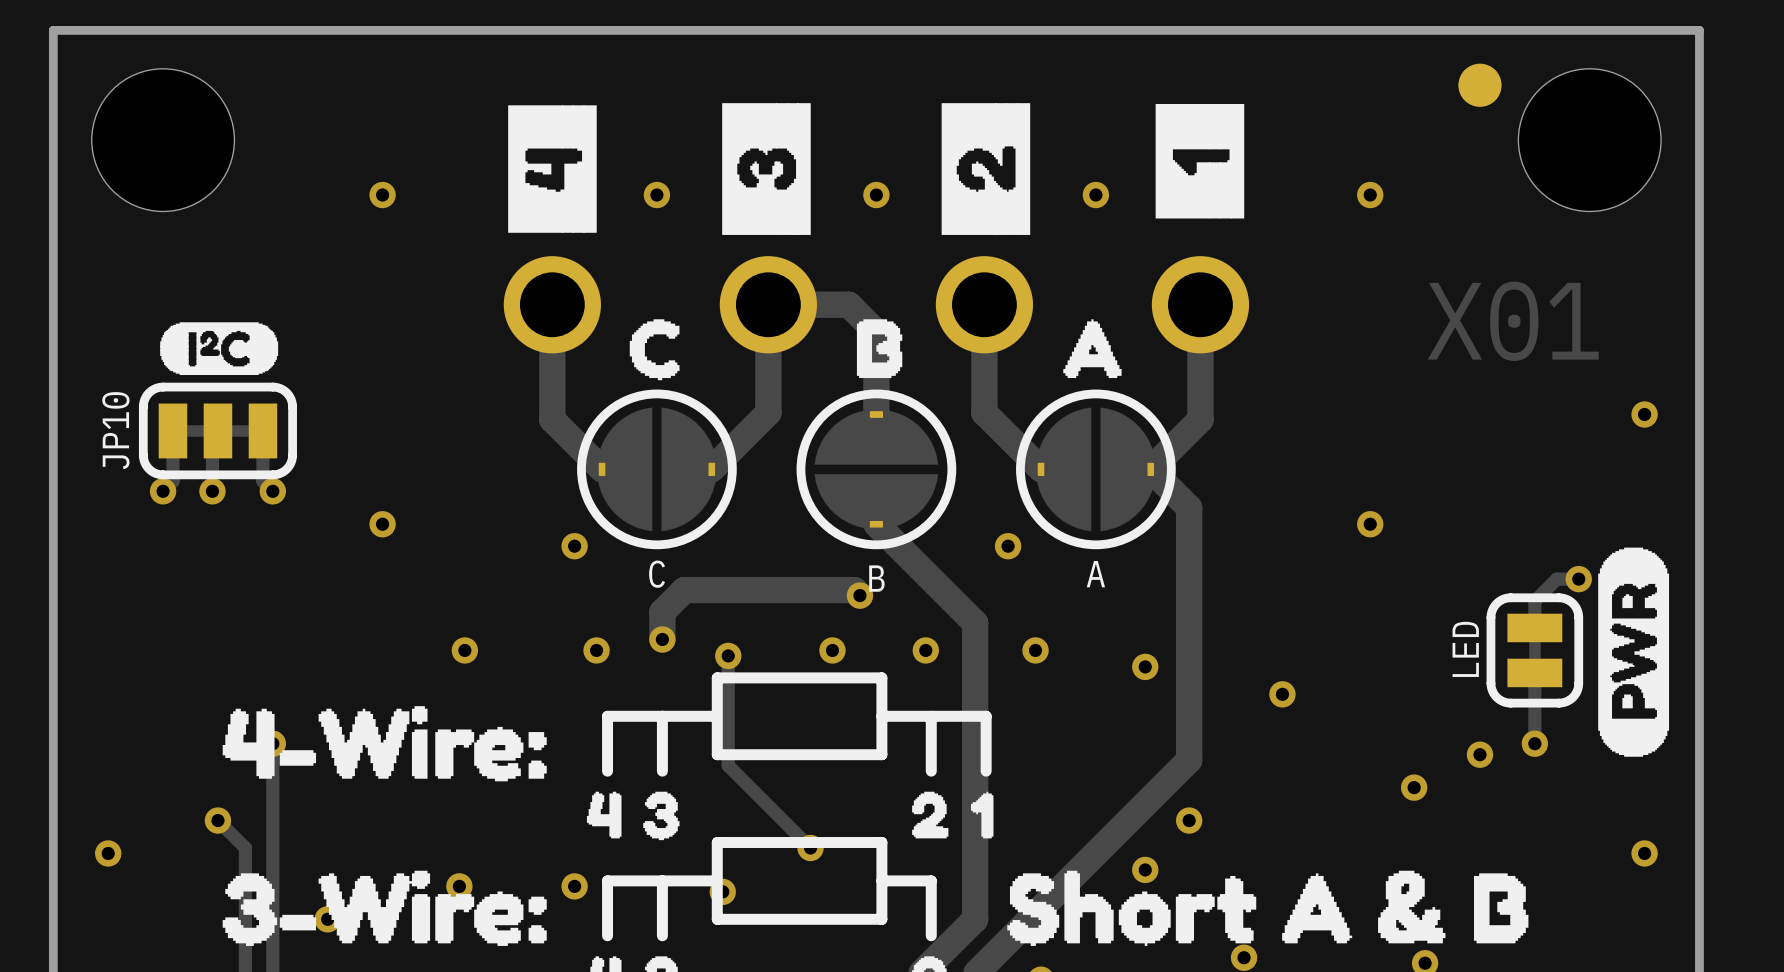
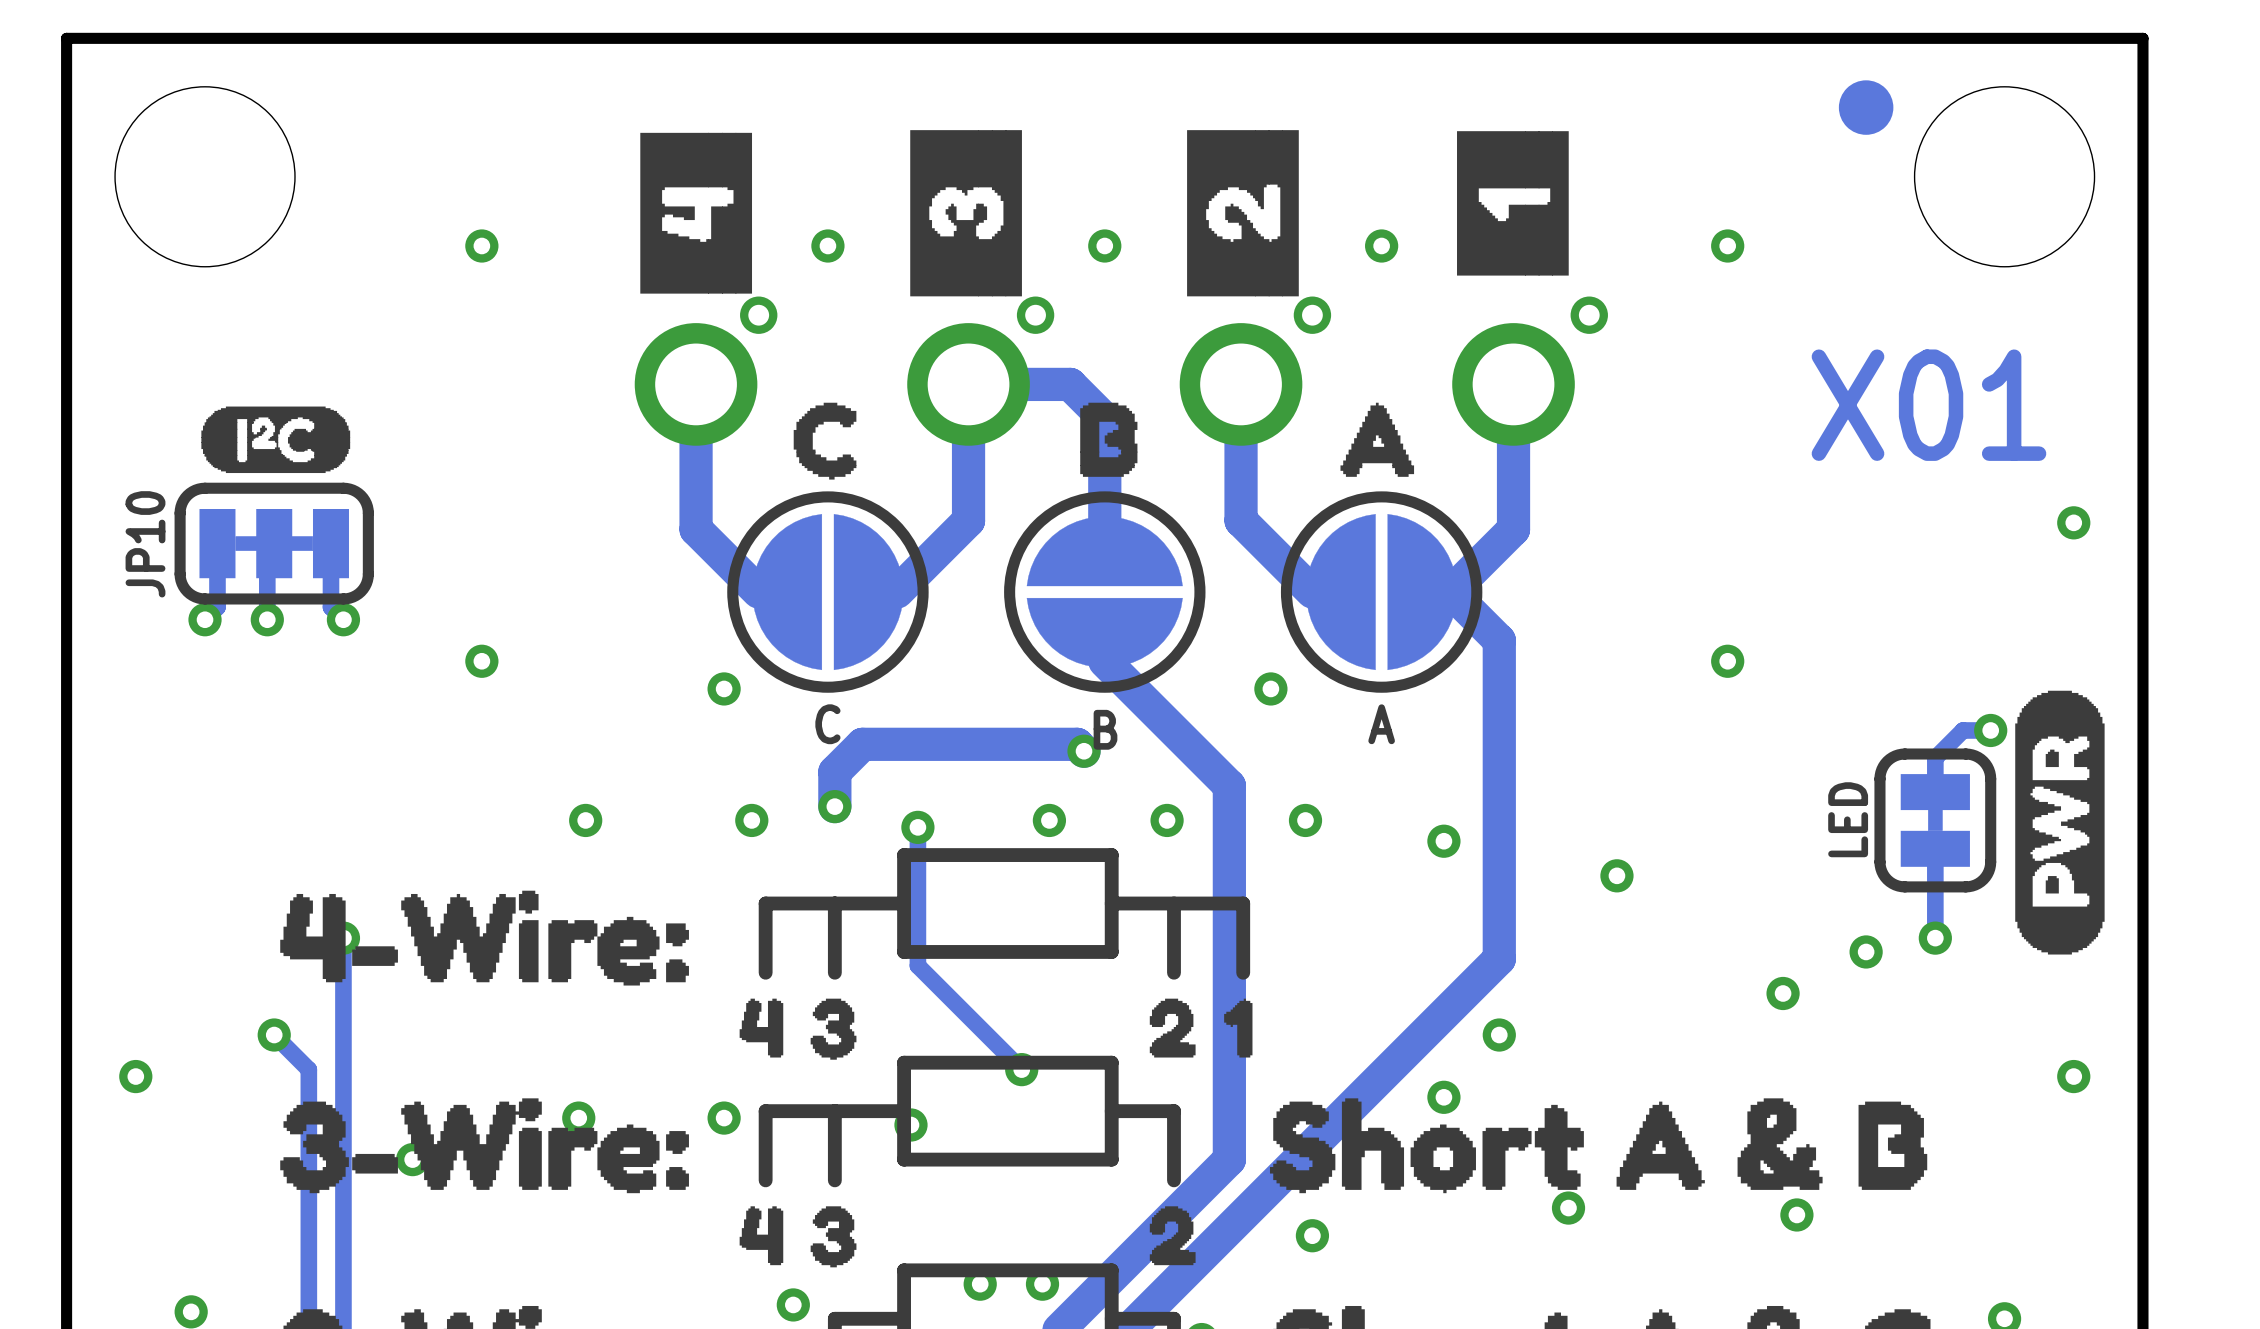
part: none -> (758, 315)
part: none -> (1035, 315)
part: none -> (1312, 315)
part: none -> (1589, 315)

